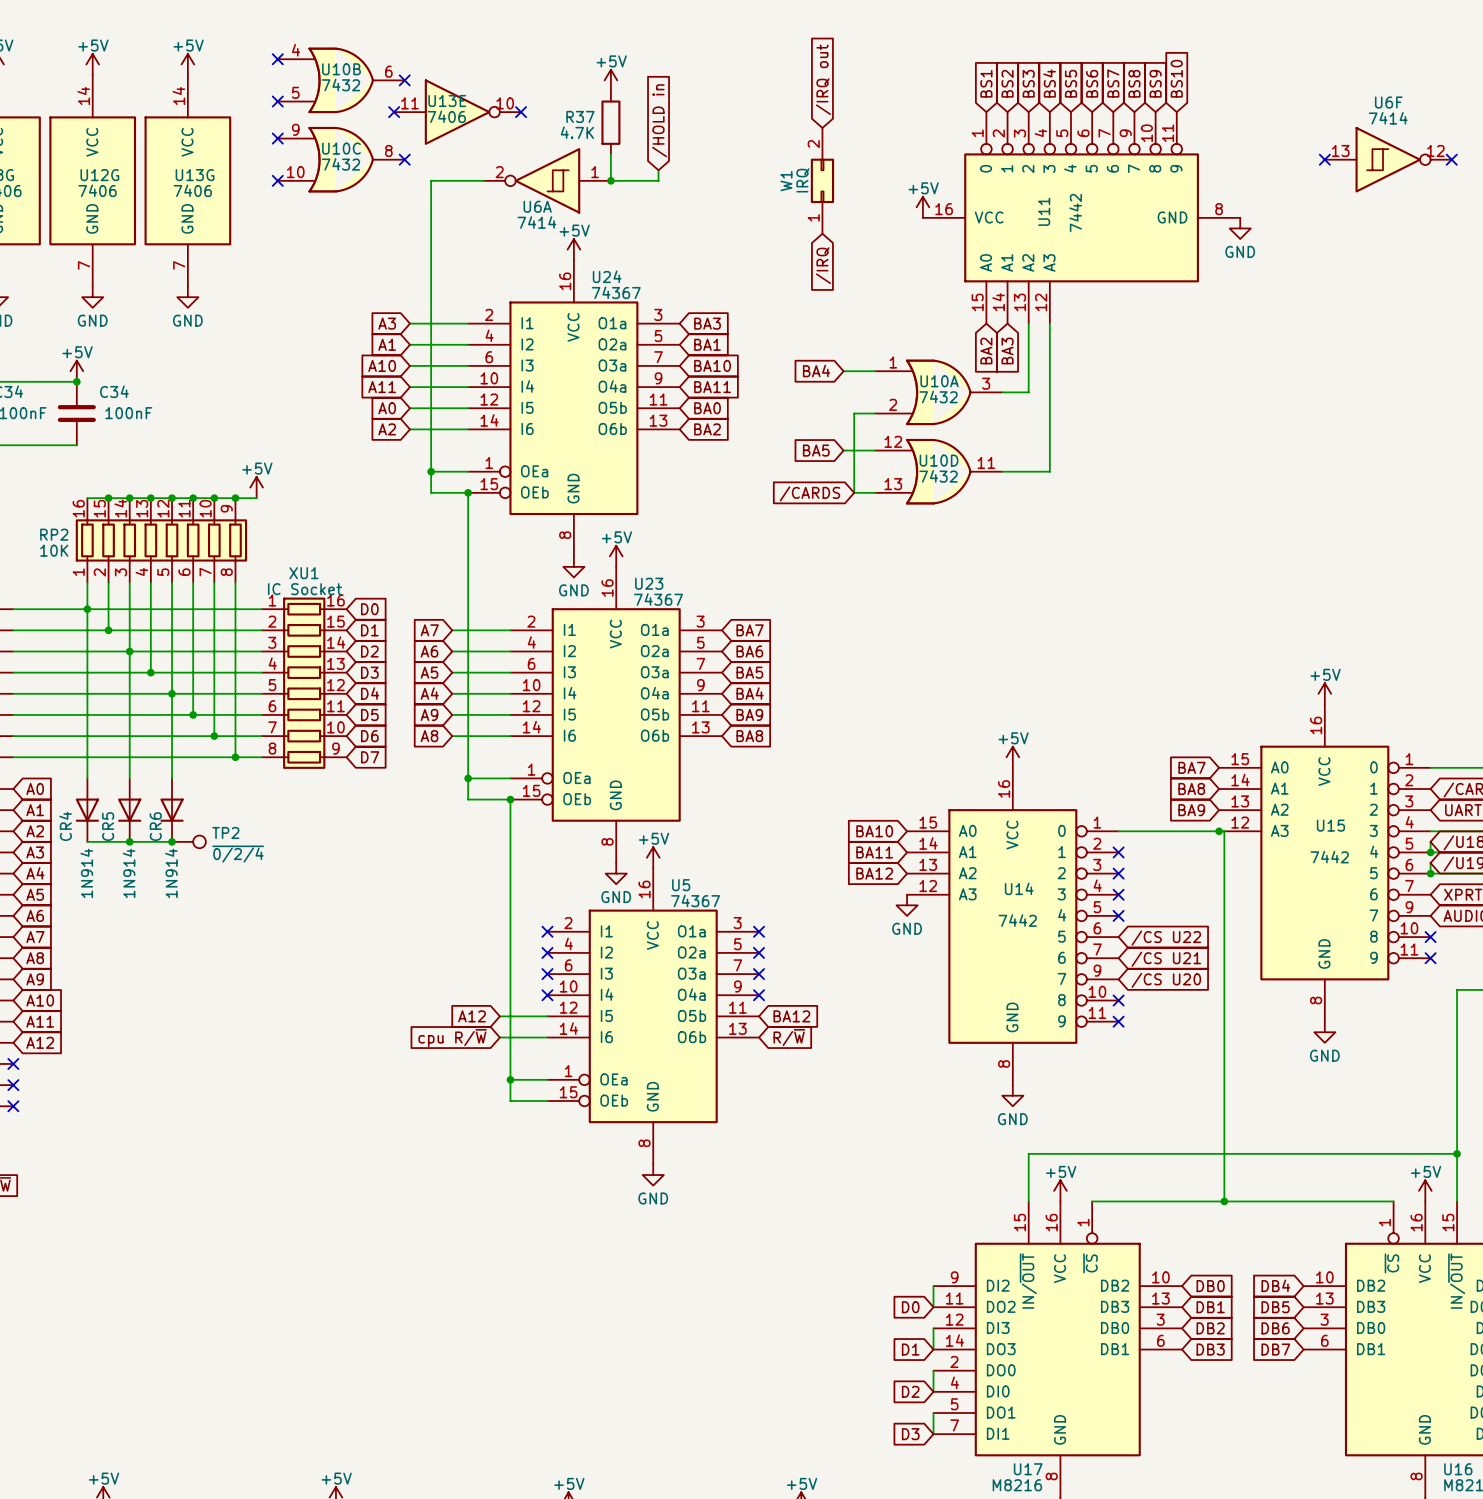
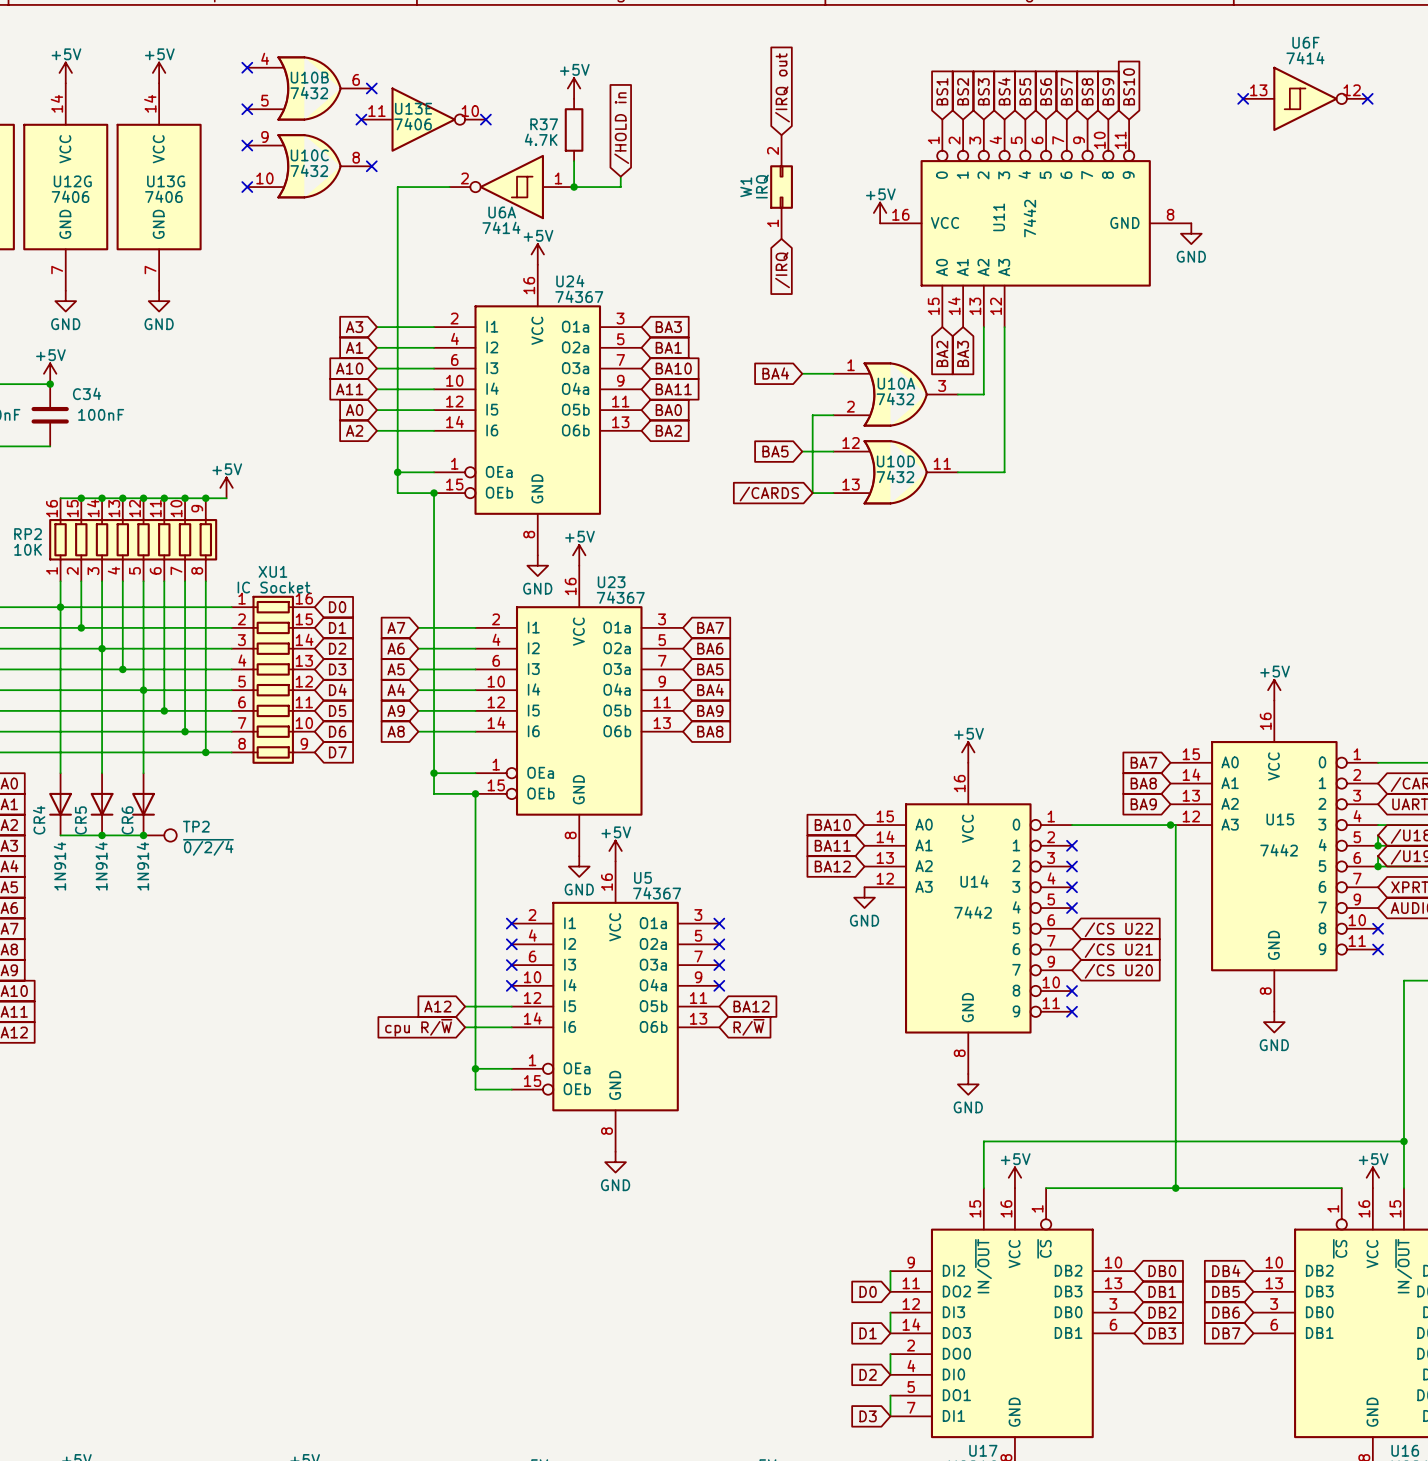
no-connect mark: none -> (1243, 98)
no-connect mark: none -> (1367, 98)
no-connect mark: (1324, 159) -> none
U6F position: (1388, 159) -> (1305, 98)
no-connect mark: (1451, 159) -> none

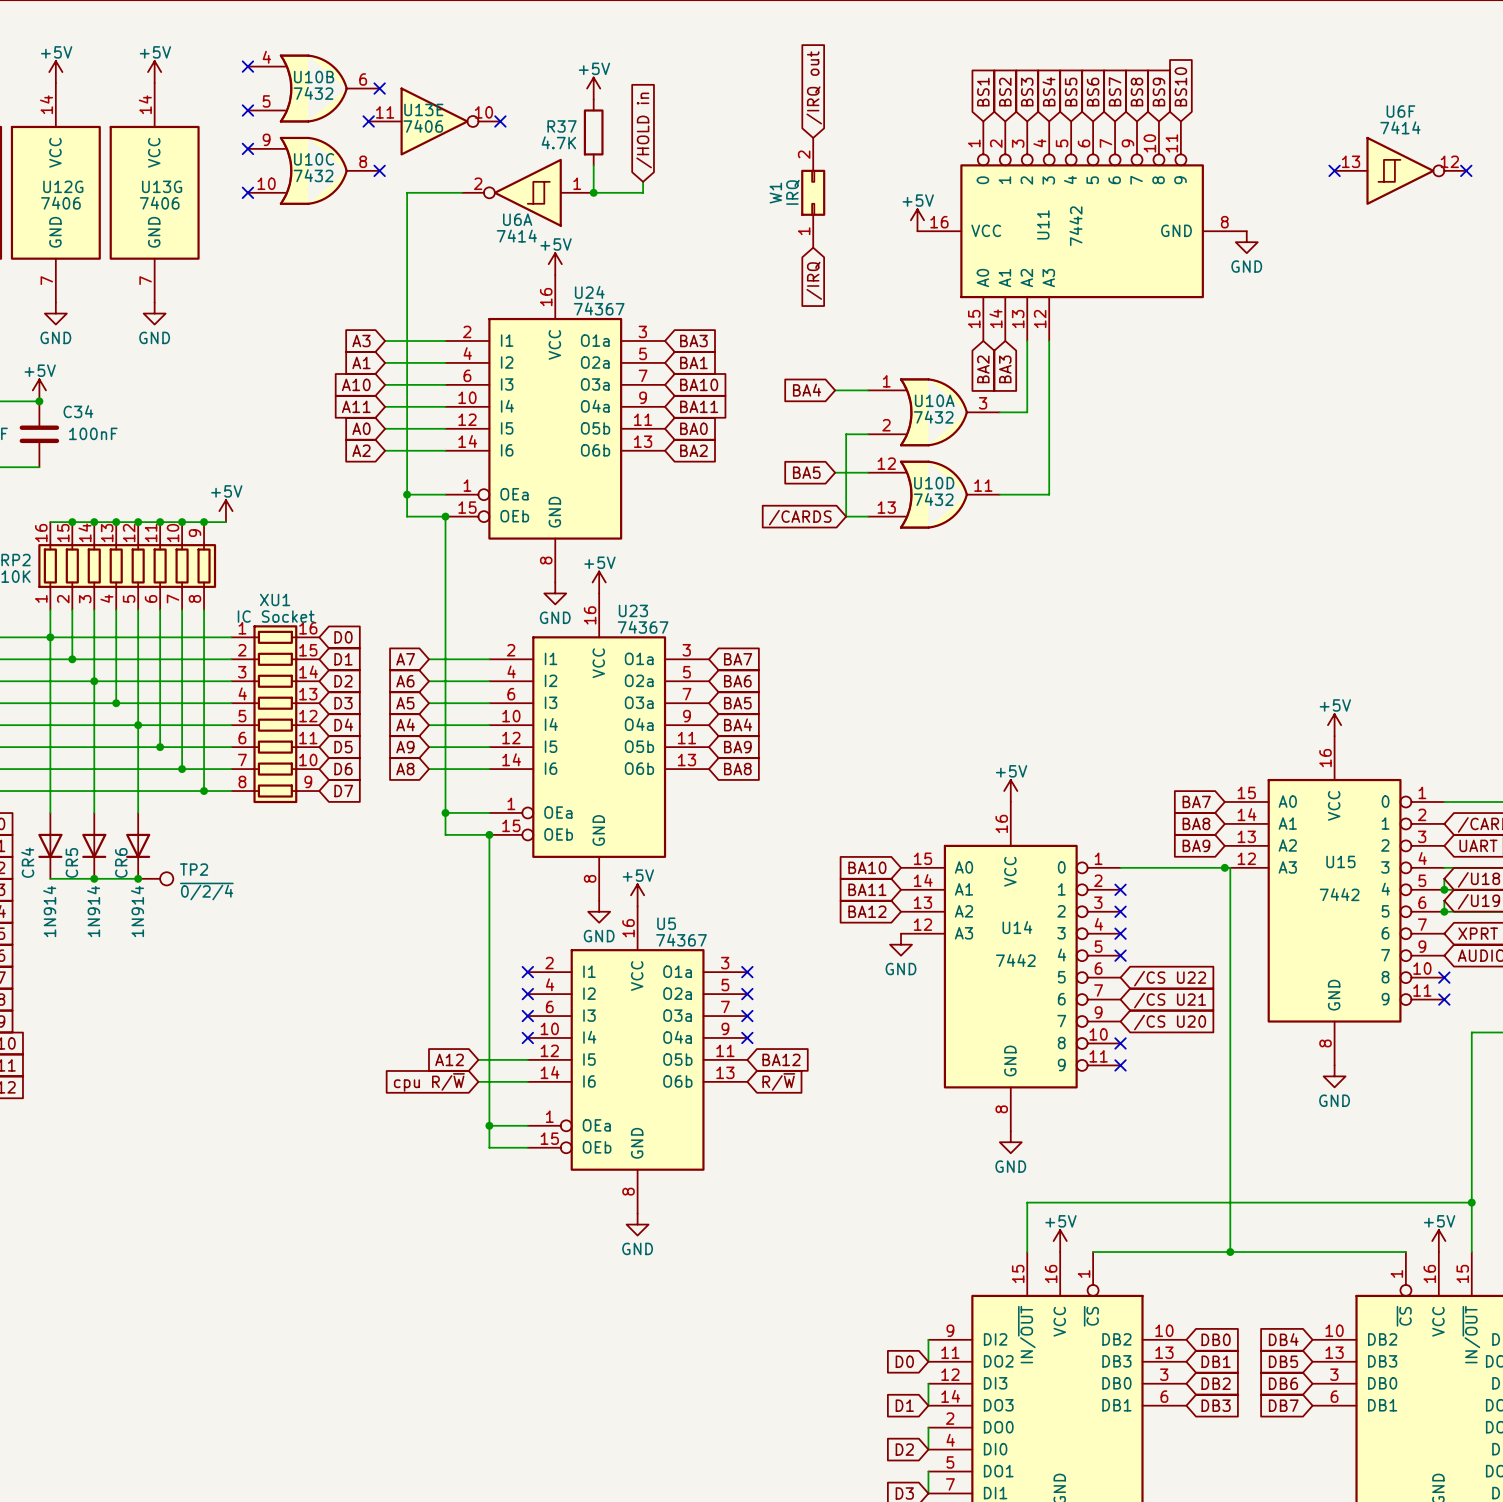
no-connect mark: (1243, 98) -> none
U6F position: (1305, 98) -> (1400, 170)
no-connect mark: (1367, 98) -> none
no-connect mark: none -> (1334, 170)
no-connect mark: none -> (1466, 170)

